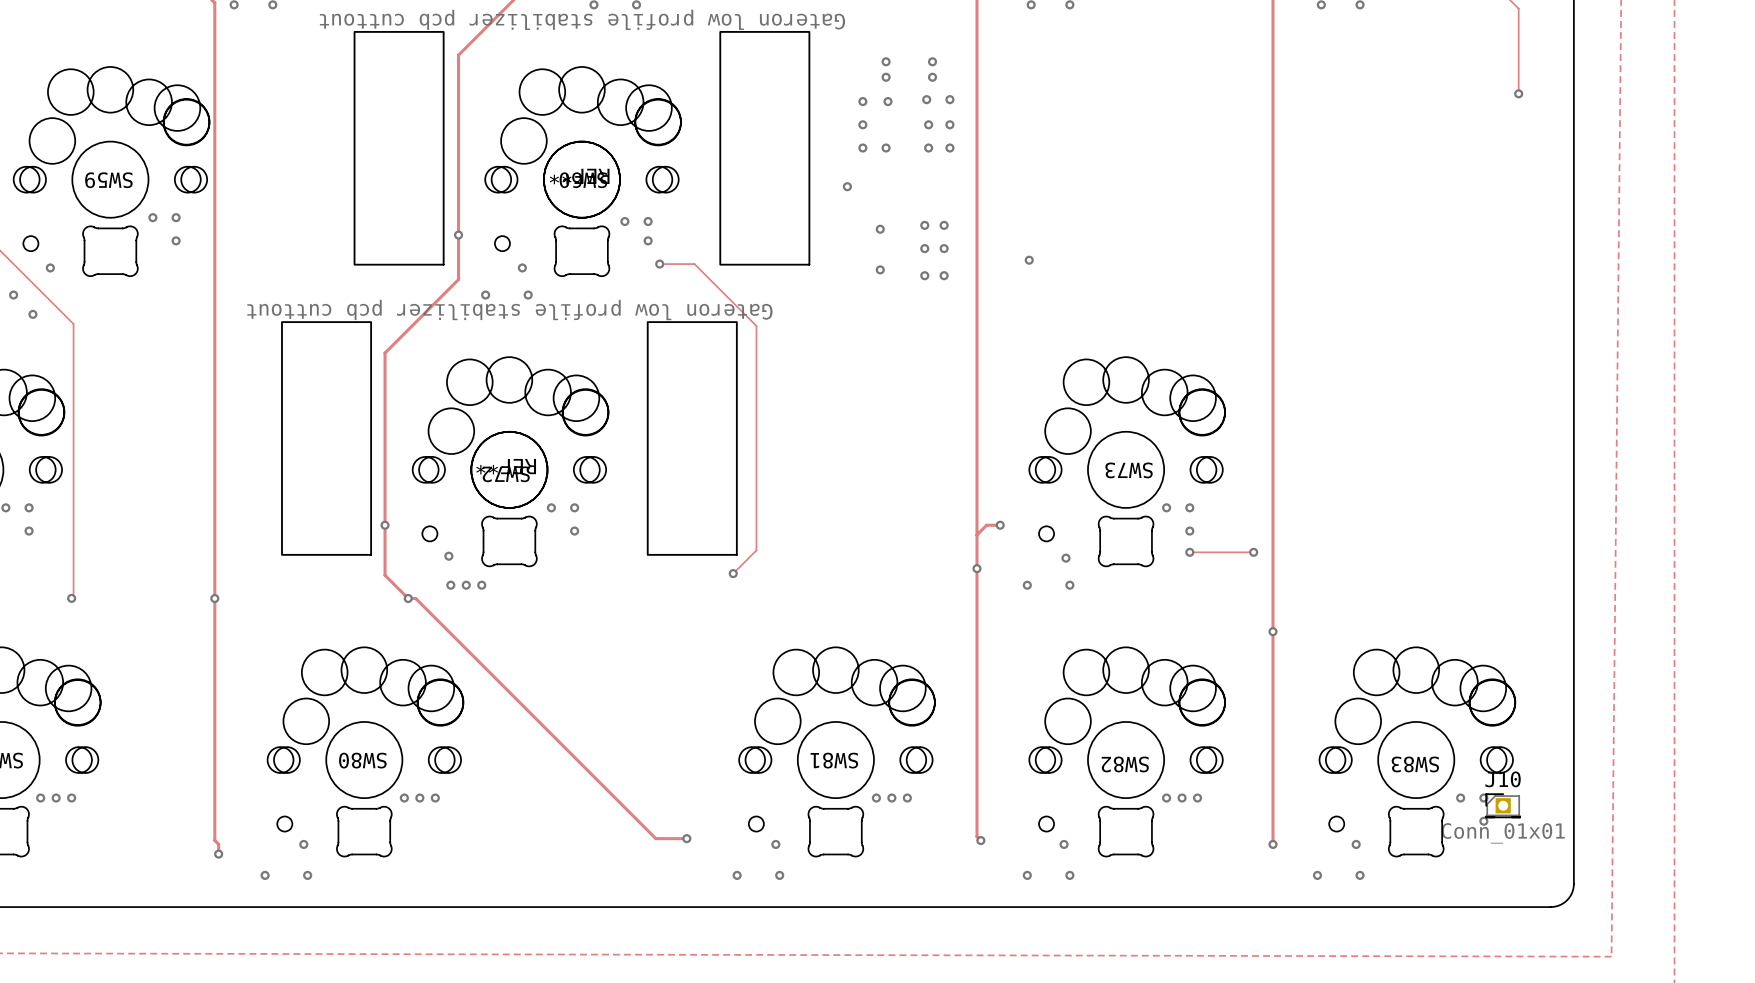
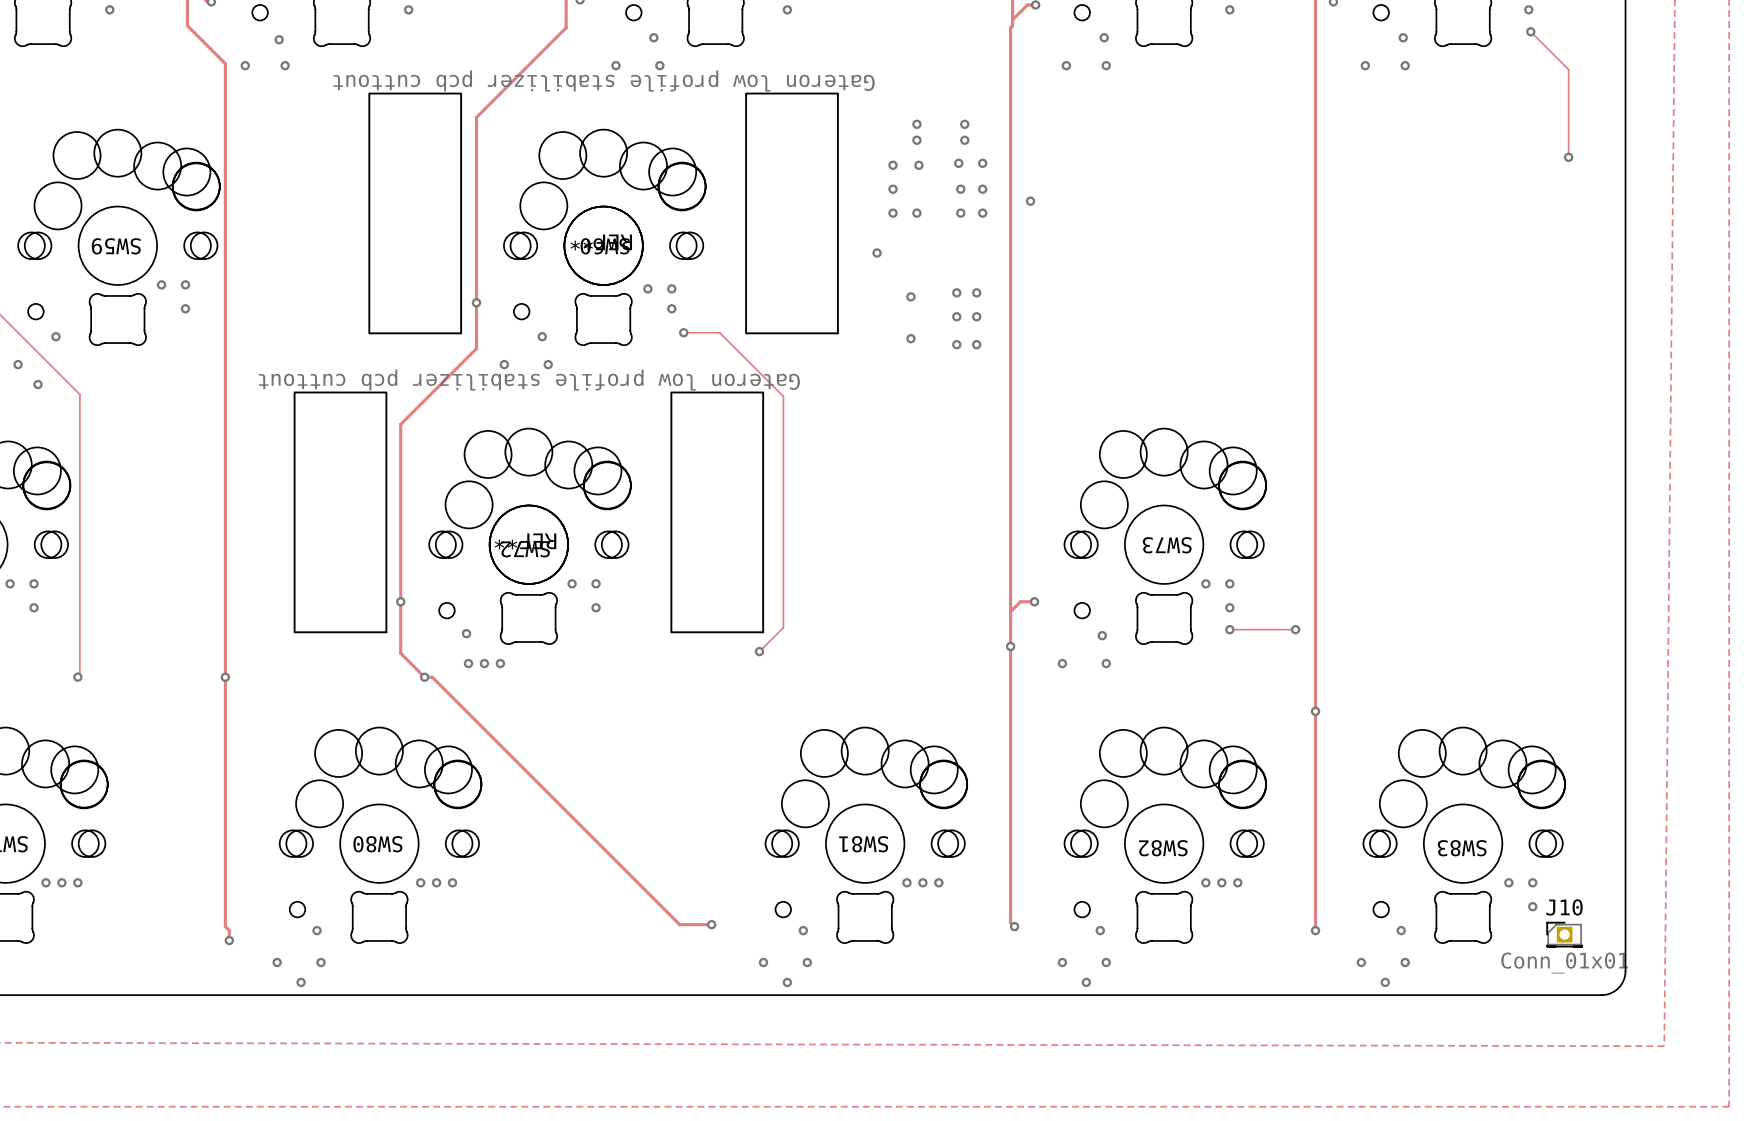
via: none -> (1030, 201)
via: (1029, 260) -> none
J10 position: (1503, 805) -> (1564, 934)
via: none -> (301, 982)
via: none -> (787, 982)
via: none -> (1086, 982)
via: none -> (1385, 982)

